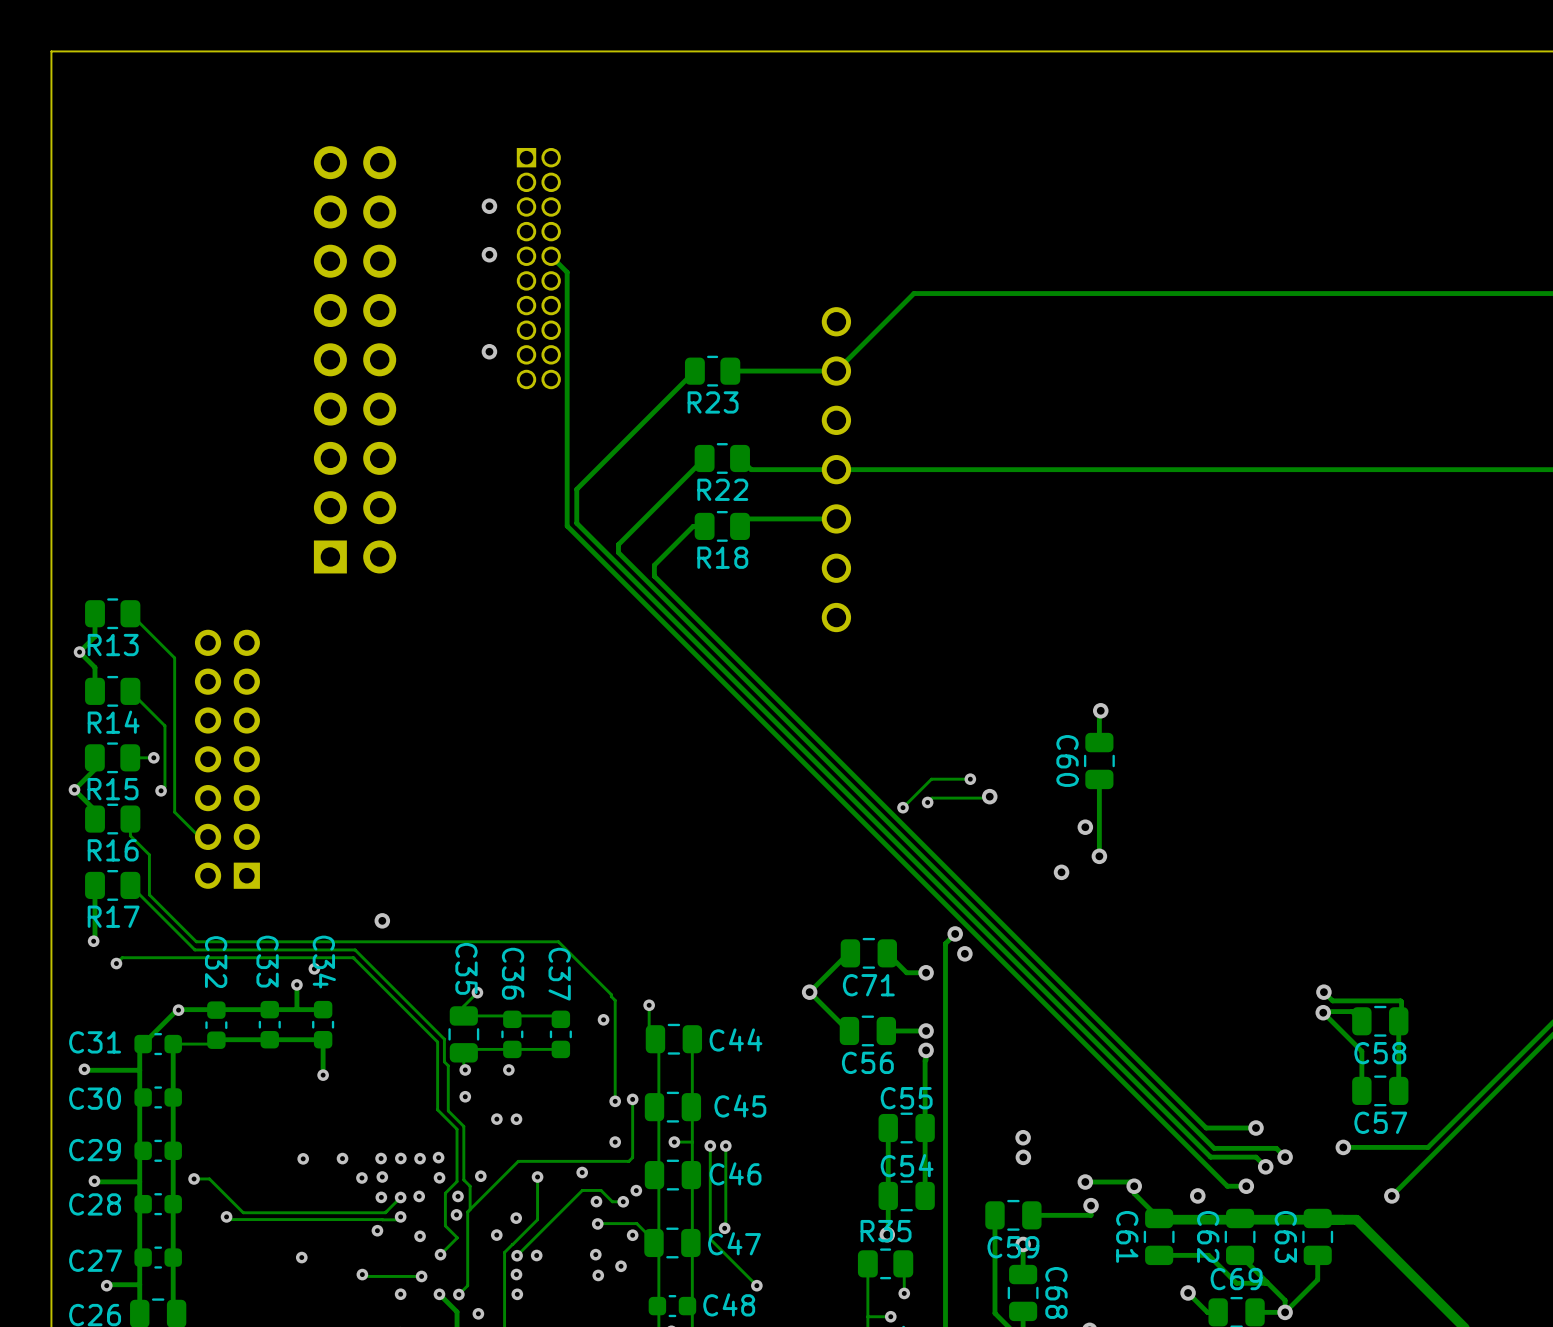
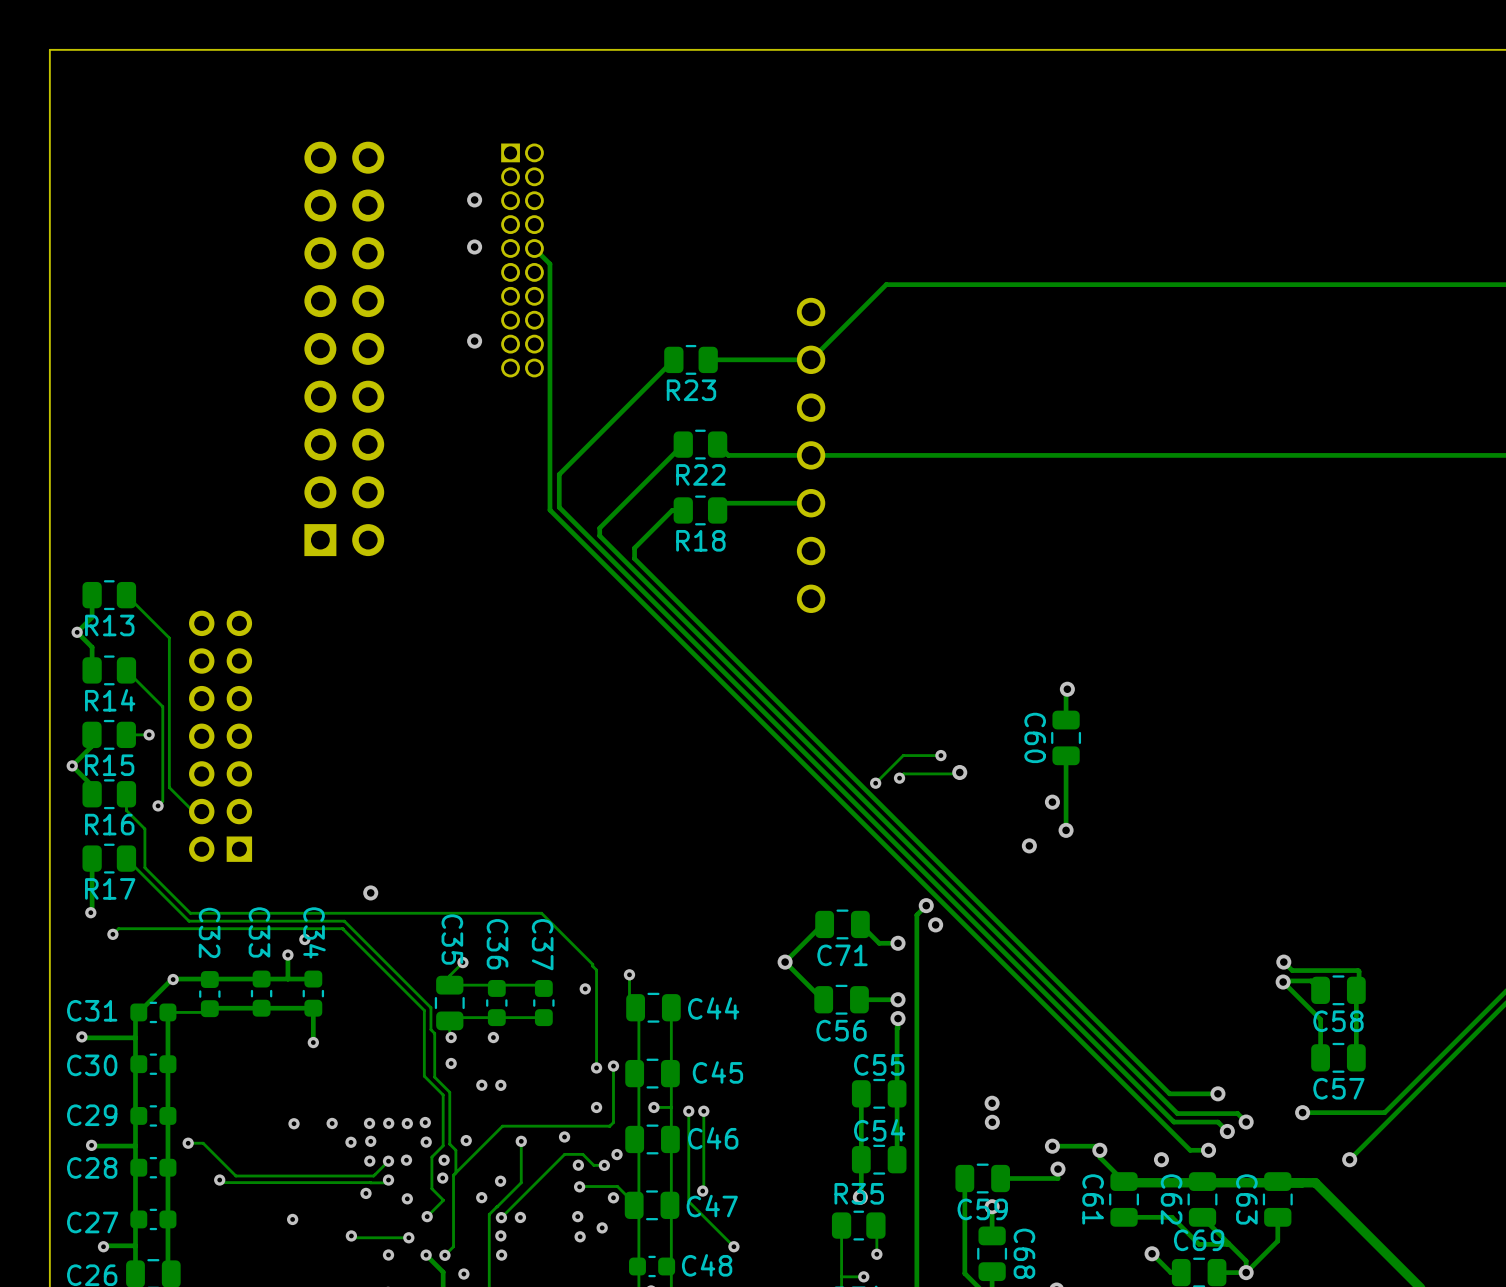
track: (164, 725) (164, 786) (161, 790) -> (159, 703) (162, 706) (162, 801) (158, 805)
via position: (161, 790) -> (158, 805)

